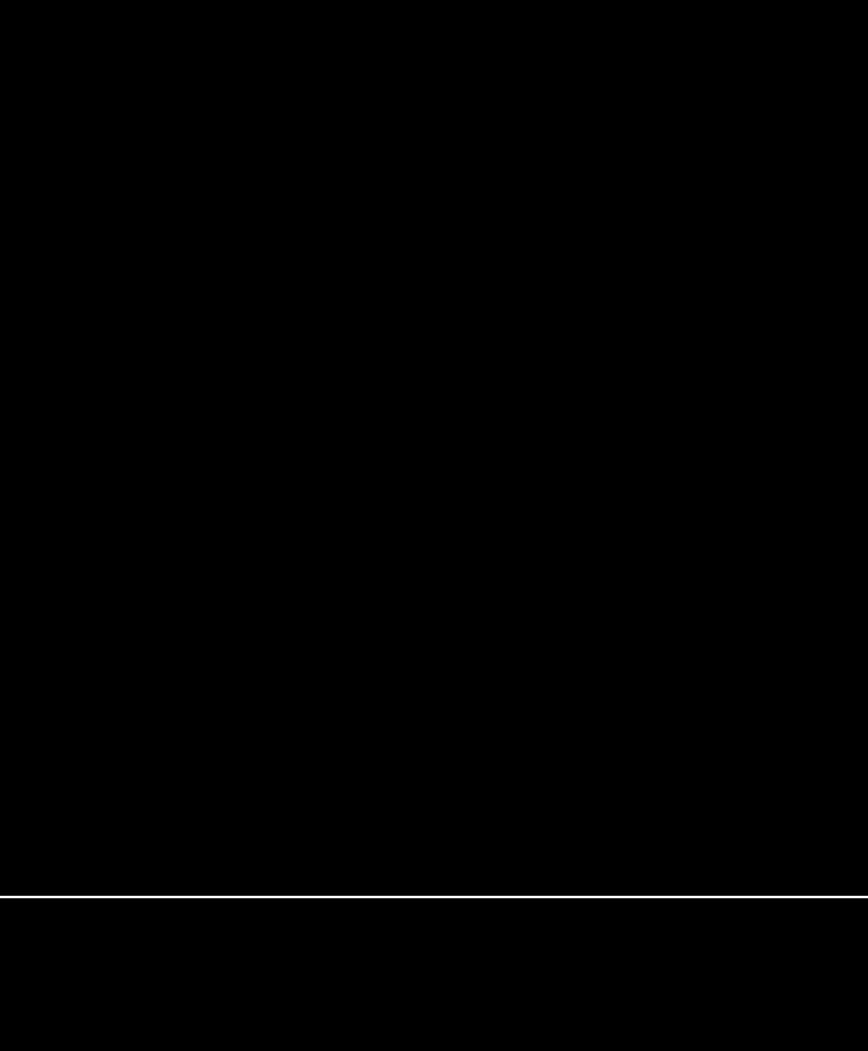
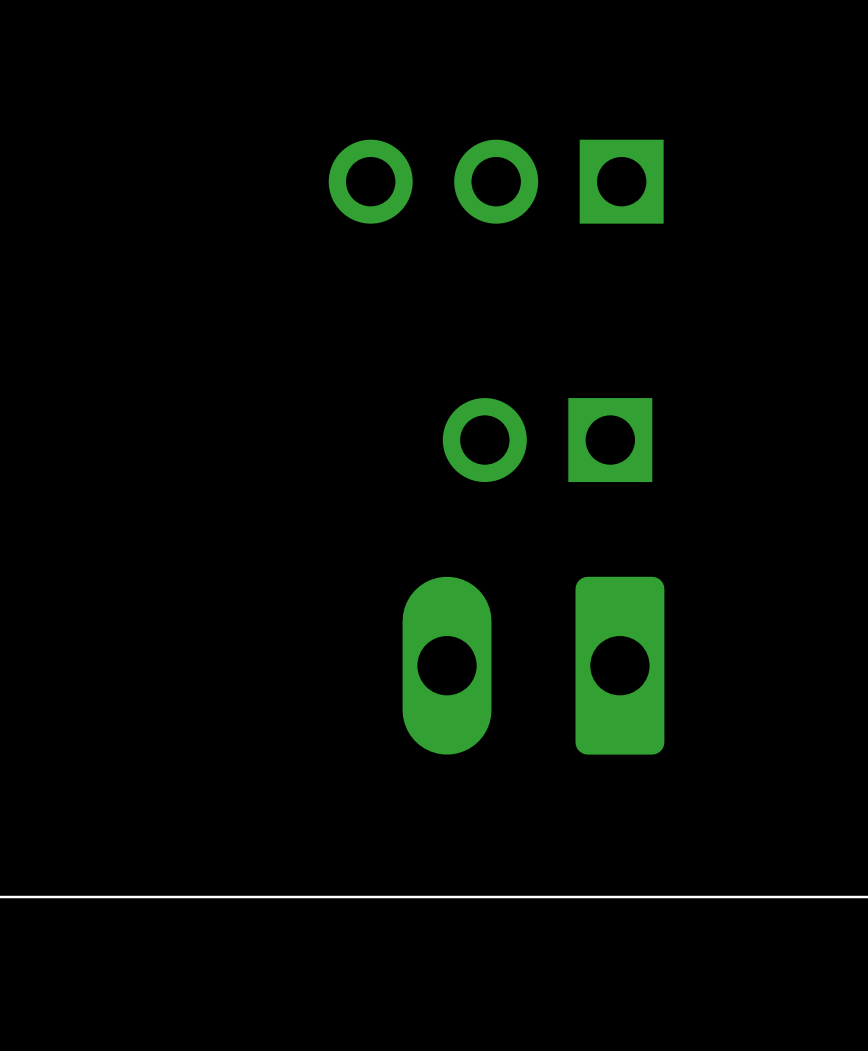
part: none -> (496, 181)
part: none -> (547, 440)
part: none -> (533, 665)

